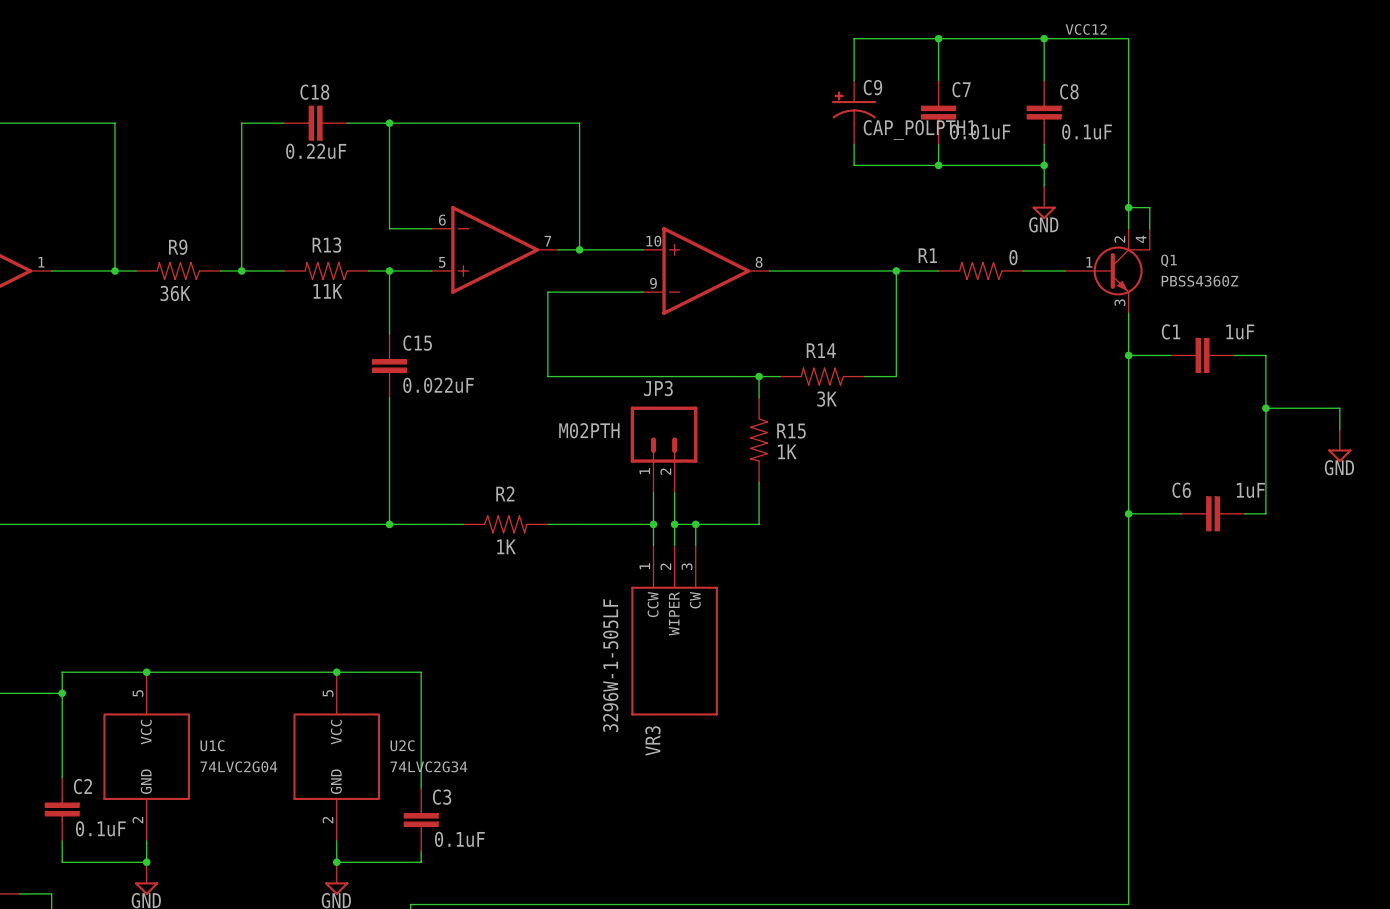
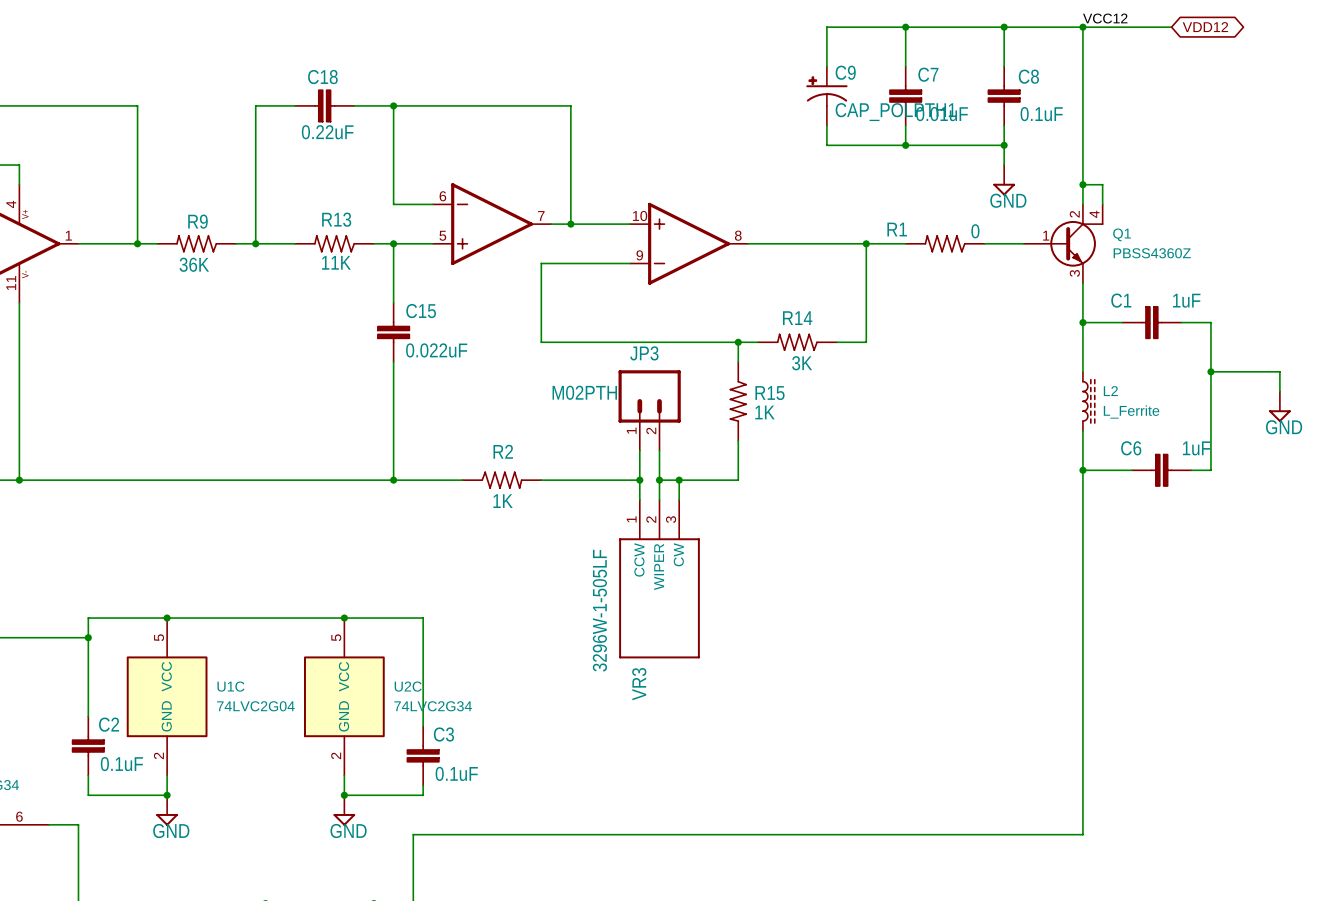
label position: VCC12 (1086, 29) -> VCC12 (1105, 18)
wire: none -> (1082, 27) (1171, 27)
junction: none -> (1082, 27)
global label: none -> VDD12 (1205, 27)
wire: (1128, 408) (1128, 471) -> none
L2: none -> L_Ferrite (1088, 401)

